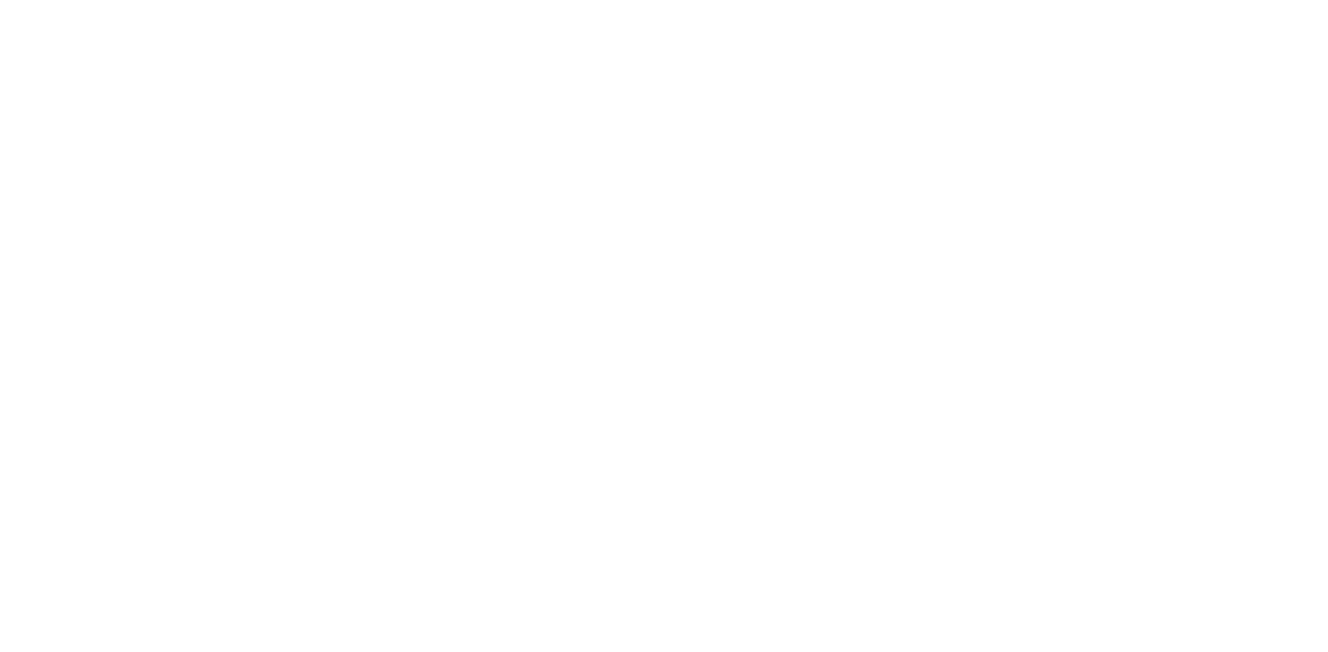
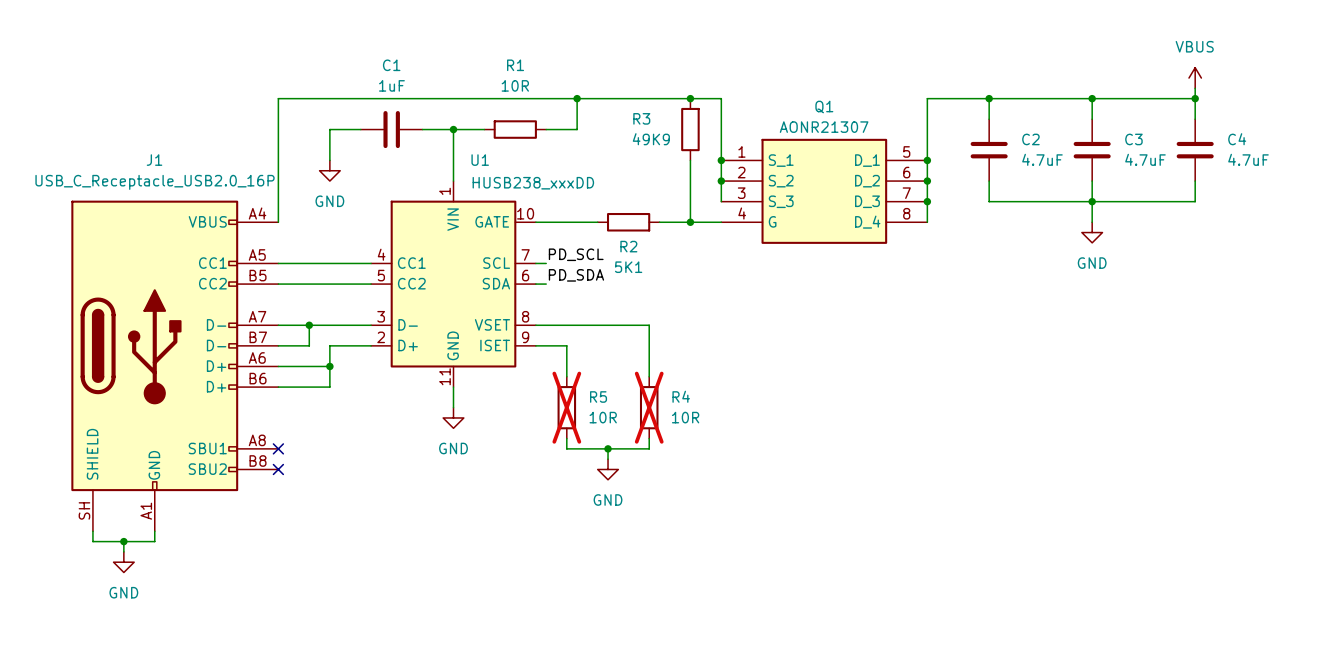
power symbol: none -> VBUS (1195, 78)
wire: none -> (1195, 88) (1195, 119)
wire: none -> (577, 98) (577, 129) (546, 129)
junction: none -> (577, 98)
junction: none -> (690, 98)
wire: none -> (989, 98) (989, 119)
junction: none -> (989, 98)
wire: none -> (1092, 98) (1092, 119)
junction: none -> (1092, 98)
wire: none -> (1195, 98) (927, 98) (927, 222)
junction: none -> (1195, 98)
wire: none -> (360, 129) (329, 129) (329, 160)
C1: none -> 1uF (391, 129)
wire: none -> (422, 129) (484, 129)
wire: none -> (453, 129) (453, 181)
junction: none -> (453, 129)
R1: none -> 10R (515, 129)
R3: none -> 49K9 (690, 129)
C2: none -> 4.7uF (989, 150)
C3: none -> 4.7uF (1092, 150)
C4: none -> 4.7uF (1195, 150)
wire: none -> (690, 160) (690, 222)
junction: none -> (721, 160)
junction: none -> (927, 160)
power symbol: none -> GND (329, 170)
junction: none -> (721, 181)
junction: none -> (927, 181)
wire: none -> (989, 181) (989, 201) (1195, 201) (1195, 181)
wire: none -> (1092, 181) (1092, 222)
Q1: none -> AONR21307 (824, 191)
wire: none -> (721, 201) (721, 98) (278, 98) (278, 222)
junction: none -> (927, 201)
junction: none -> (1092, 201)
wire: none -> (535, 222) (597, 222)
R2: none -> 5K1 (628, 222)
wire: none -> (659, 222) (721, 222)
junction: none -> (690, 222)
power symbol: none -> GND (1092, 232)
label: none -> PD_SCL (576, 254)
wire: none -> (278, 263) (371, 263)
wire: none -> (535, 263) (546, 263)
label: none -> PD_SDA (576, 275)
wire: none -> (278, 284) (371, 284)
U1: none -> HUSB238_xxxDD (453, 284)
wire: none -> (535, 284) (546, 284)
wire: none -> (278, 325) (371, 325)
wire: none -> (309, 325) (309, 345) (278, 345)
junction: none -> (309, 325)
wire: none -> (535, 325) (649, 325) (649, 376)
wire: none -> (371, 345) (329, 345) (329, 387) (278, 387)
wire: none -> (535, 345) (566, 345) (566, 376)
J1: none -> USB_C_Receptacle_USB2.0_16P (174, 365)
wire: none -> (278, 366) (329, 366)
junction: none -> (329, 366)
wire: none -> (453, 387) (453, 407)
R5: none -> 10R (566, 407)
R4: none -> 10R (649, 407)
power symbol: none -> GND (453, 417)
wire: none -> (566, 438) (566, 448) (649, 448) (649, 438)
no-connect mark: none -> (278, 448)
wire: none -> (608, 448) (608, 459)
junction: none -> (608, 448)
no-connect mark: none -> (278, 469)
power symbol: none -> GND (608, 469)
wire: none -> (92, 531) (92, 541) (154, 541) (154, 531)
wire: none -> (123, 541) (123, 551)
junction: none -> (123, 541)
power symbol: none -> GND (123, 562)

